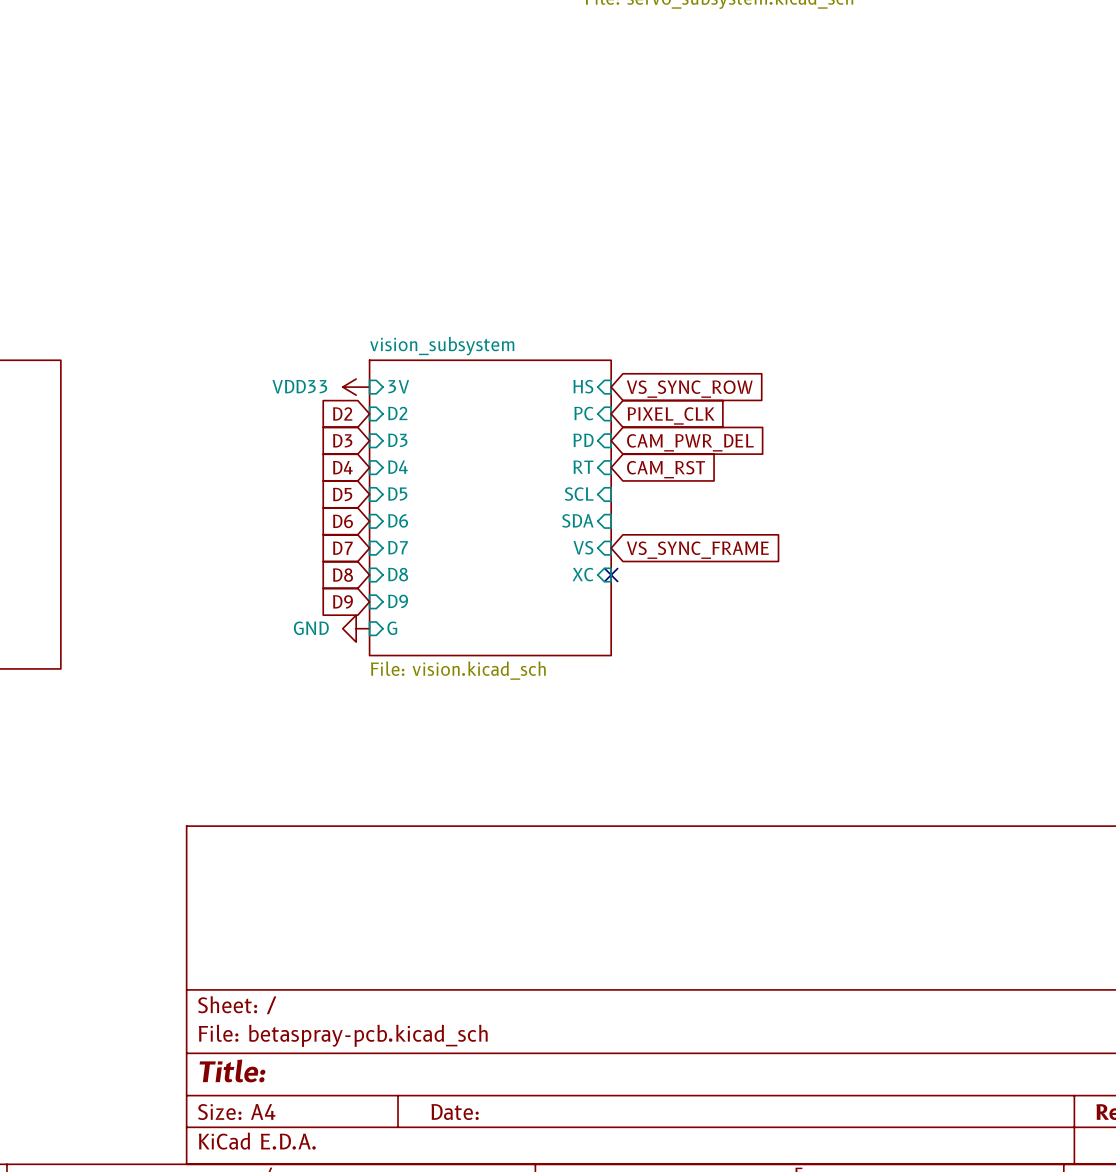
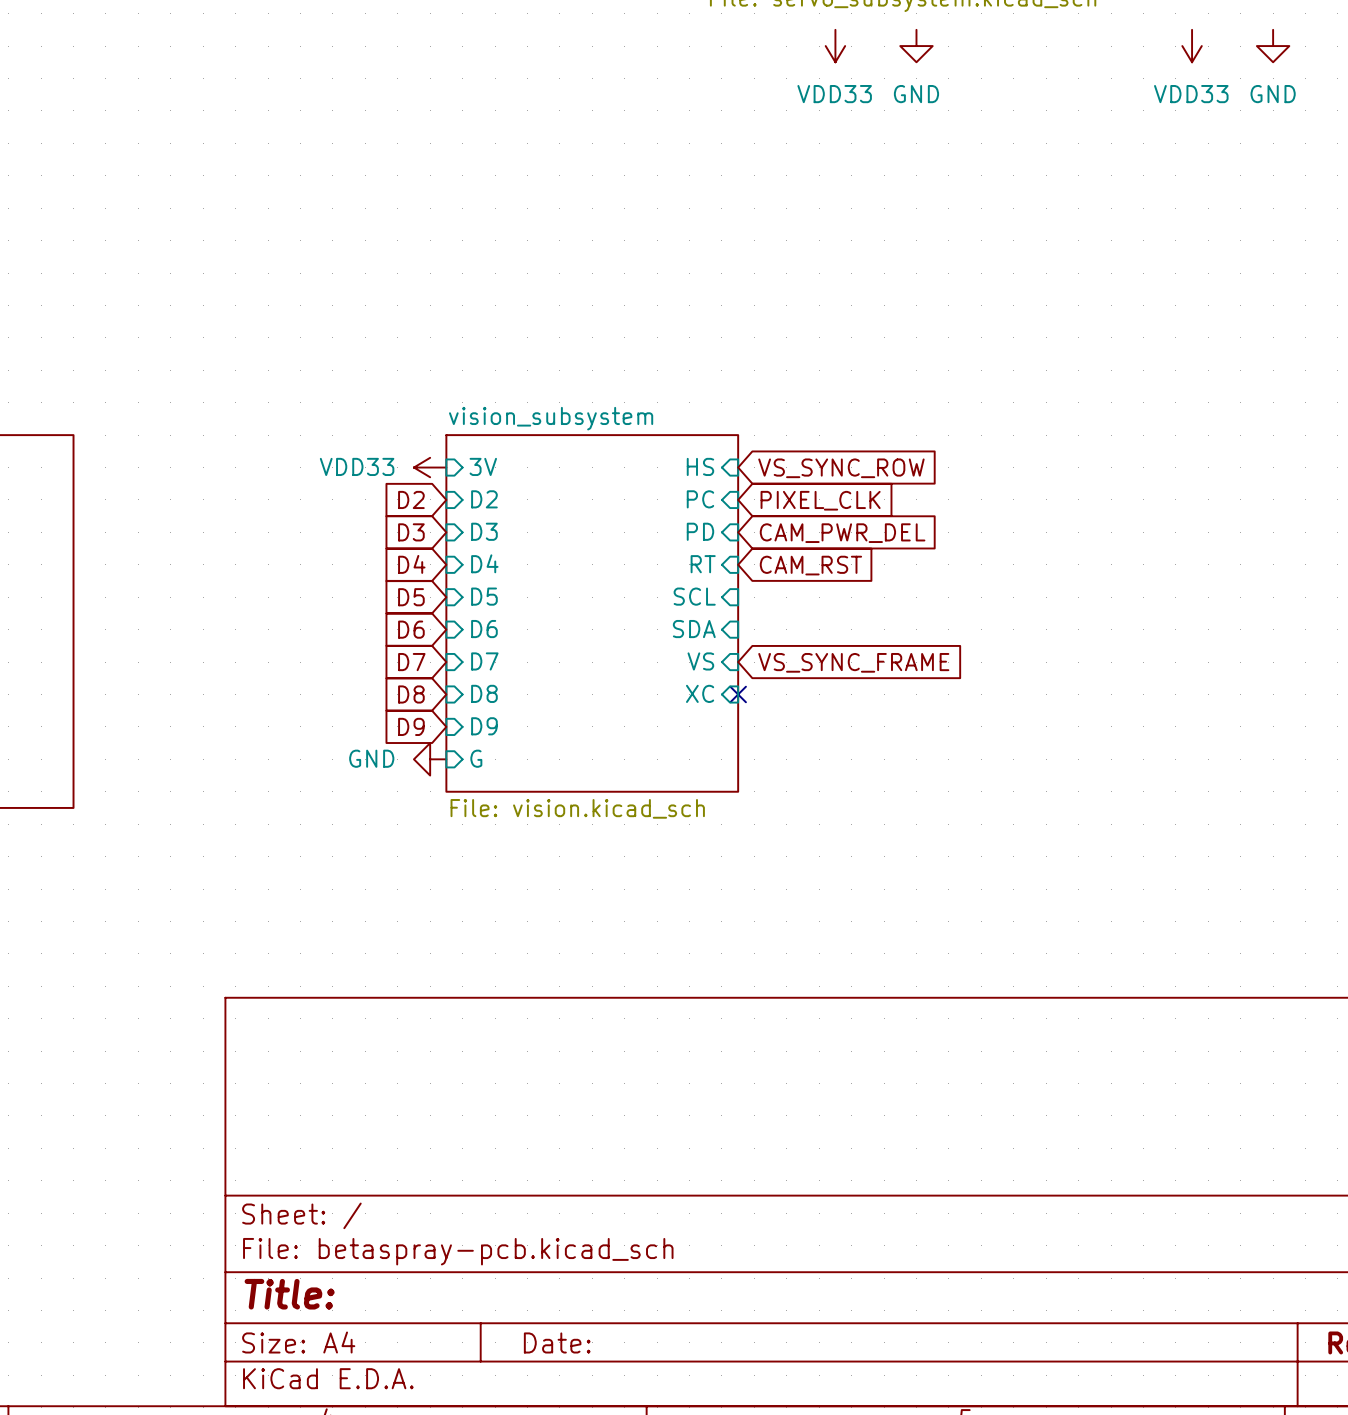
power symbol: none -> VDD33 (835, 46)
power symbol: none -> GND (916, 46)
power symbol: none -> VDD33 (1192, 46)
power symbol: none -> GND (1273, 46)

